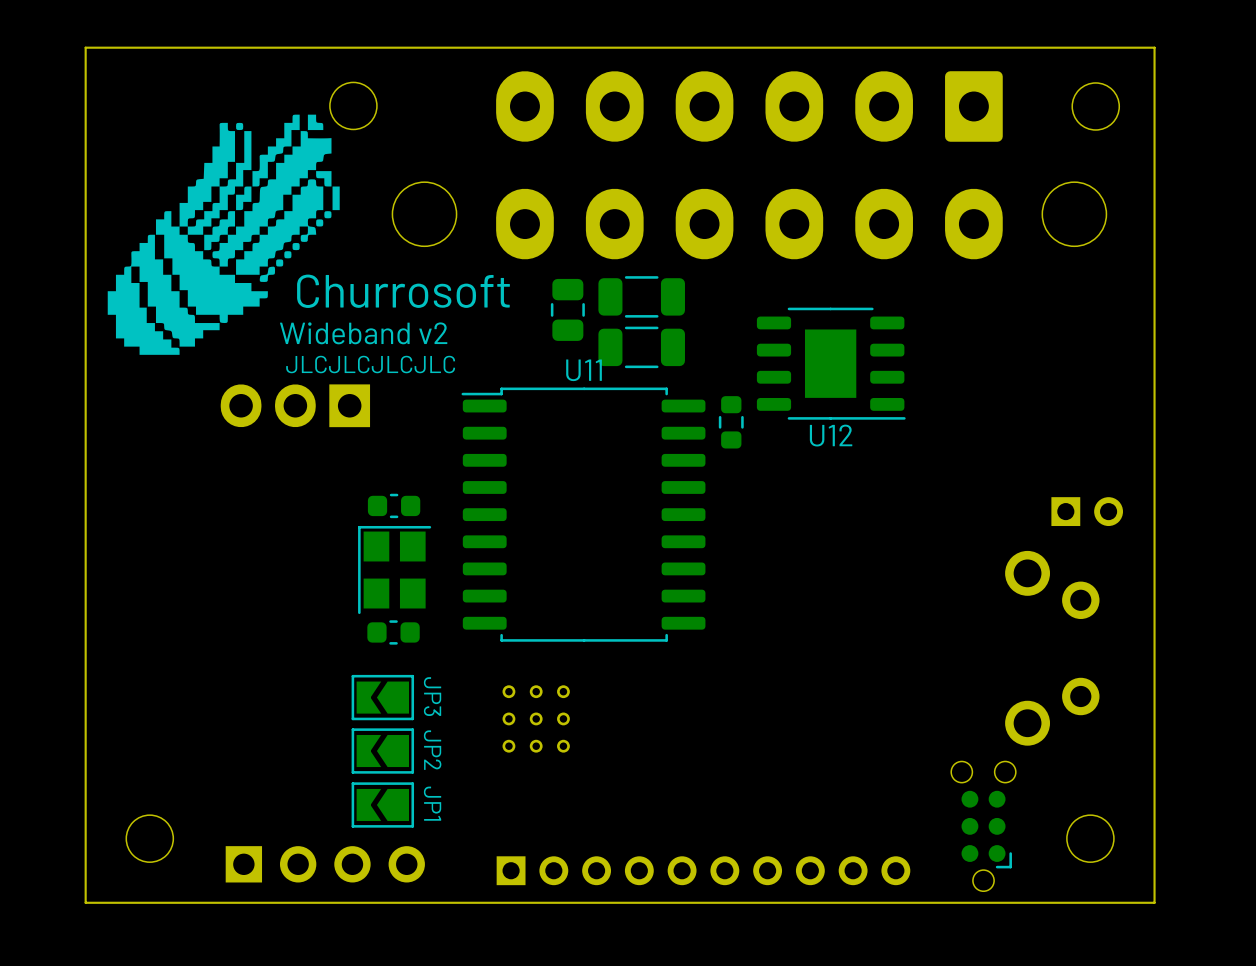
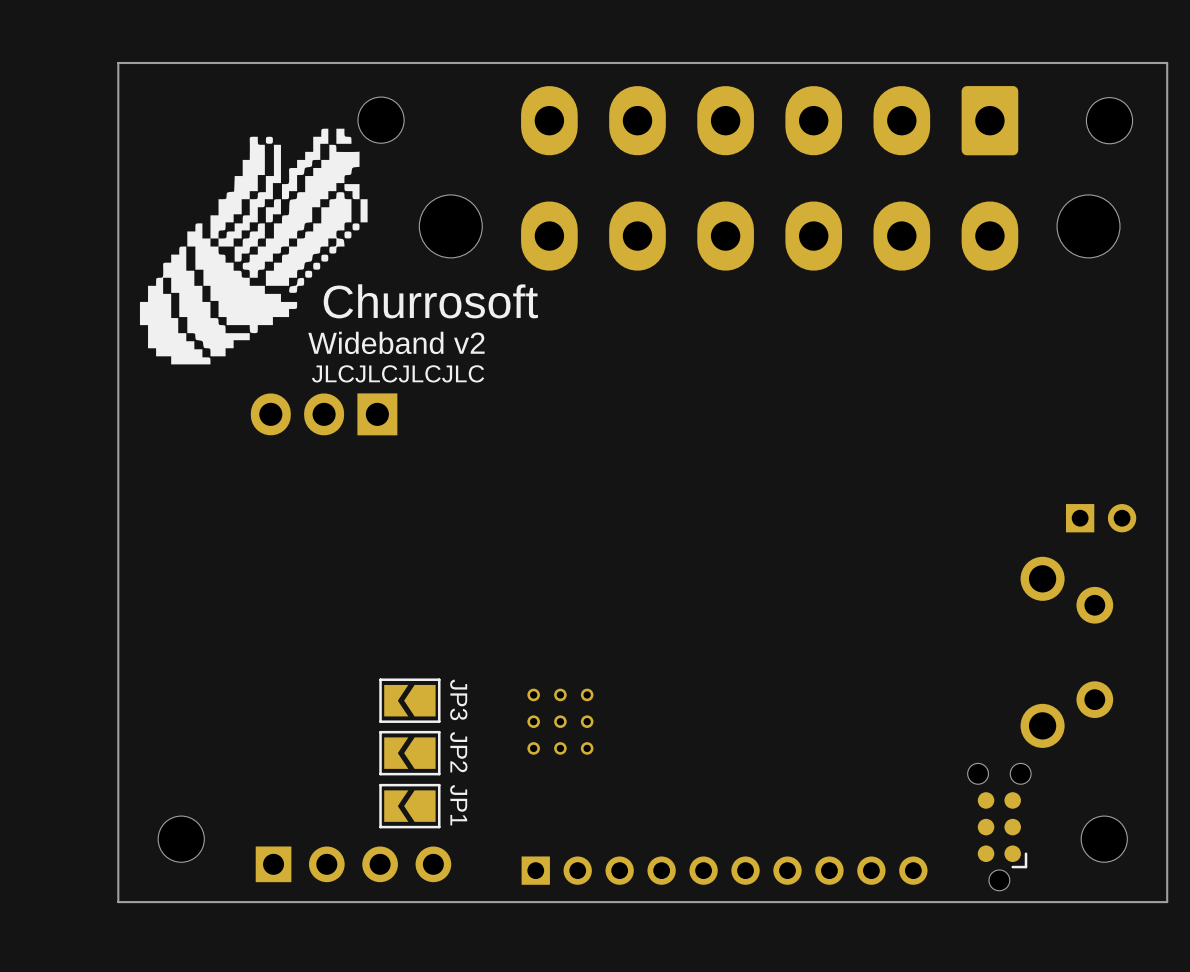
part: (641, 296) -> none
part: (567, 309) -> none
part: (641, 347) -> none
U12: (831, 363) -> none
part: (731, 422) -> none
part: (394, 505) -> none
U11: (583, 514) -> none
part: (394, 570) -> none
part: (393, 632) -> none

